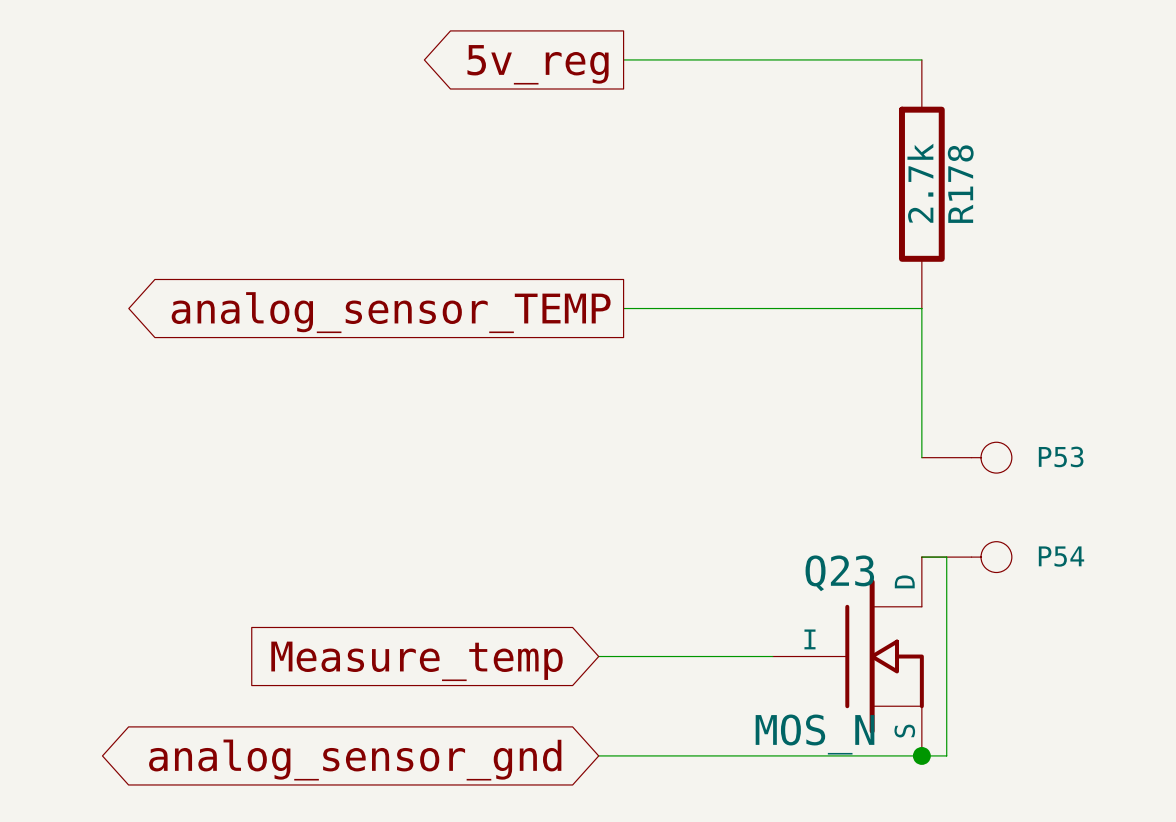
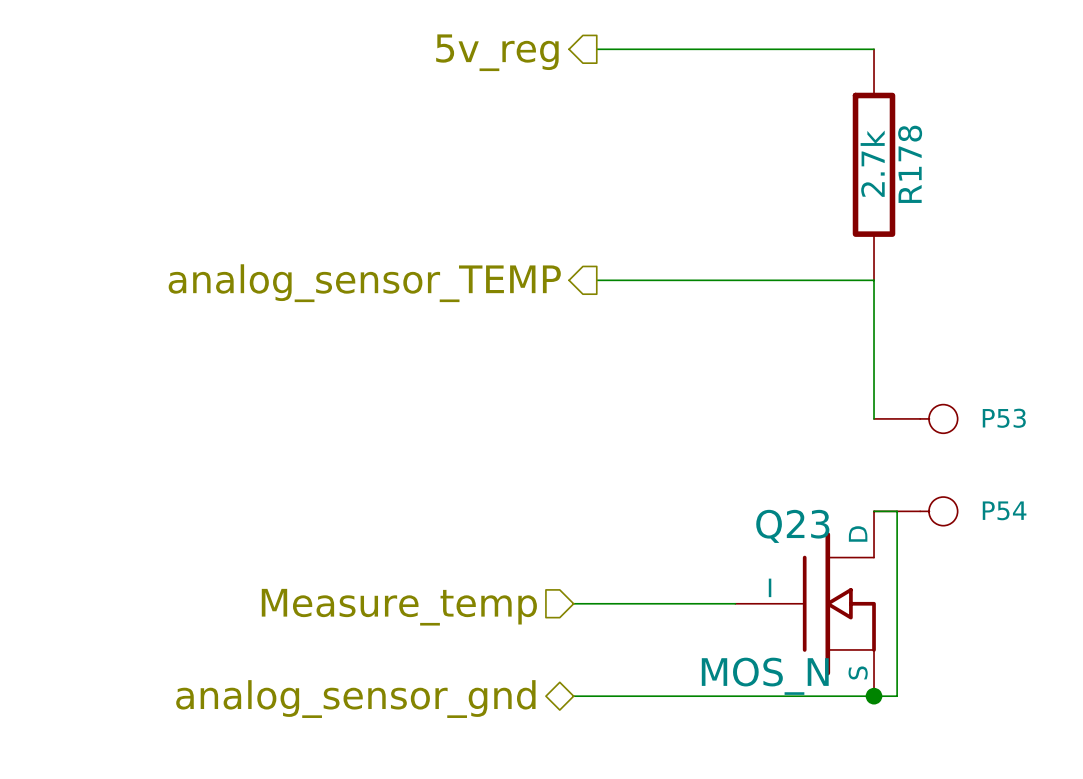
hierarchical label: none -> 5v_reg (497, 52)
global label: 5v_reg (538, 64) -> none
hierarchical label: none -> analog_sensor_TEMP (364, 283)
global label: analog_sensor_TEMP (391, 312) -> none
hierarchical label: none -> Measure_temp (399, 607)
global label: Measure_temp (416, 661) -> none
hierarchical label: none -> analog_sensor_gnd (355, 699)
global label: analog_sensor_gnd (355, 760) -> none

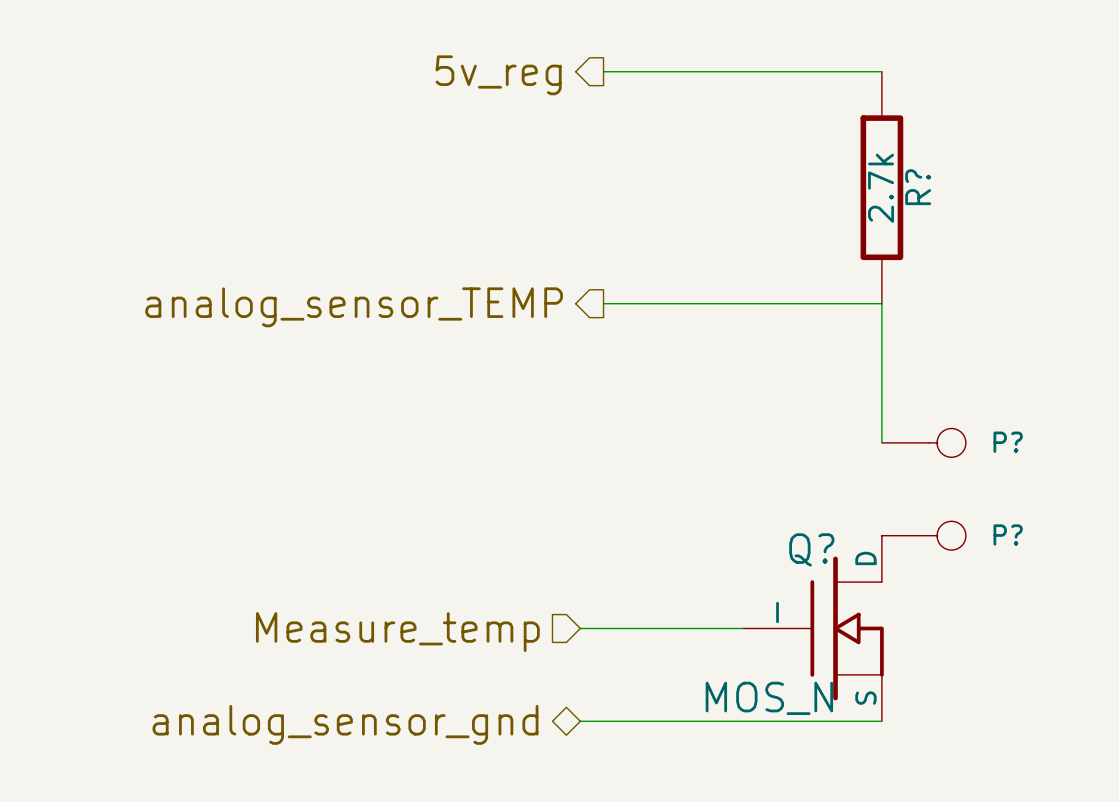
R178 name: R178 (910, 164) -> R? (918, 187)
P53 name: P53 (1004, 418) -> P? (1008, 442)
P54 name: P54 (1004, 510) -> P? (1008, 535)
wire: (874, 511) (897, 511) (897, 696) (874, 696) -> none
Q23 name: Q23 (792, 526) -> Q? (811, 549)
junction: (874, 696) -> none

